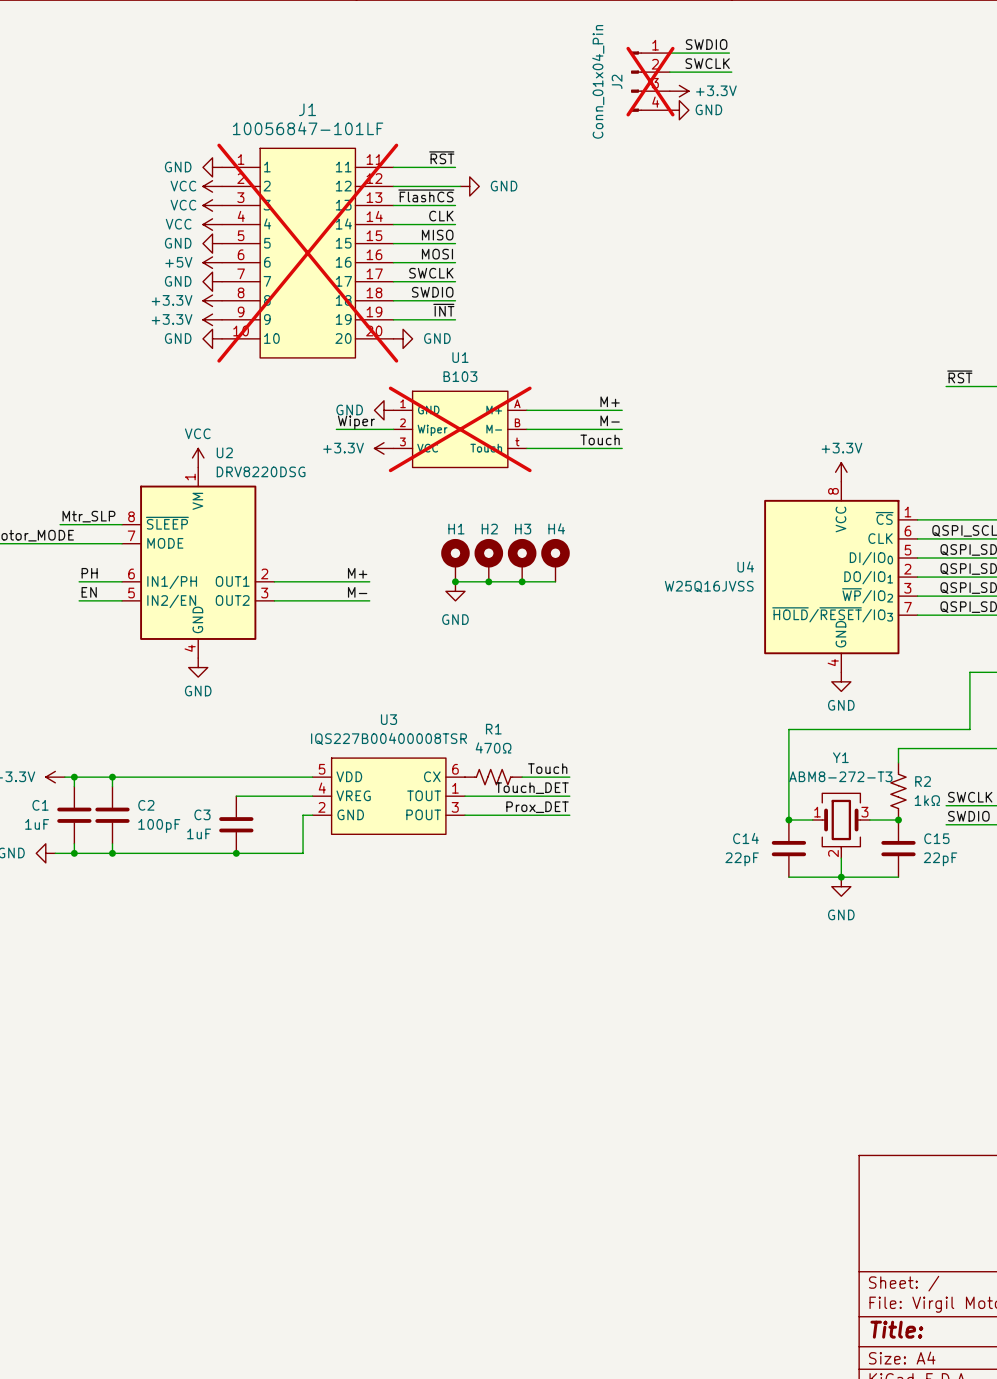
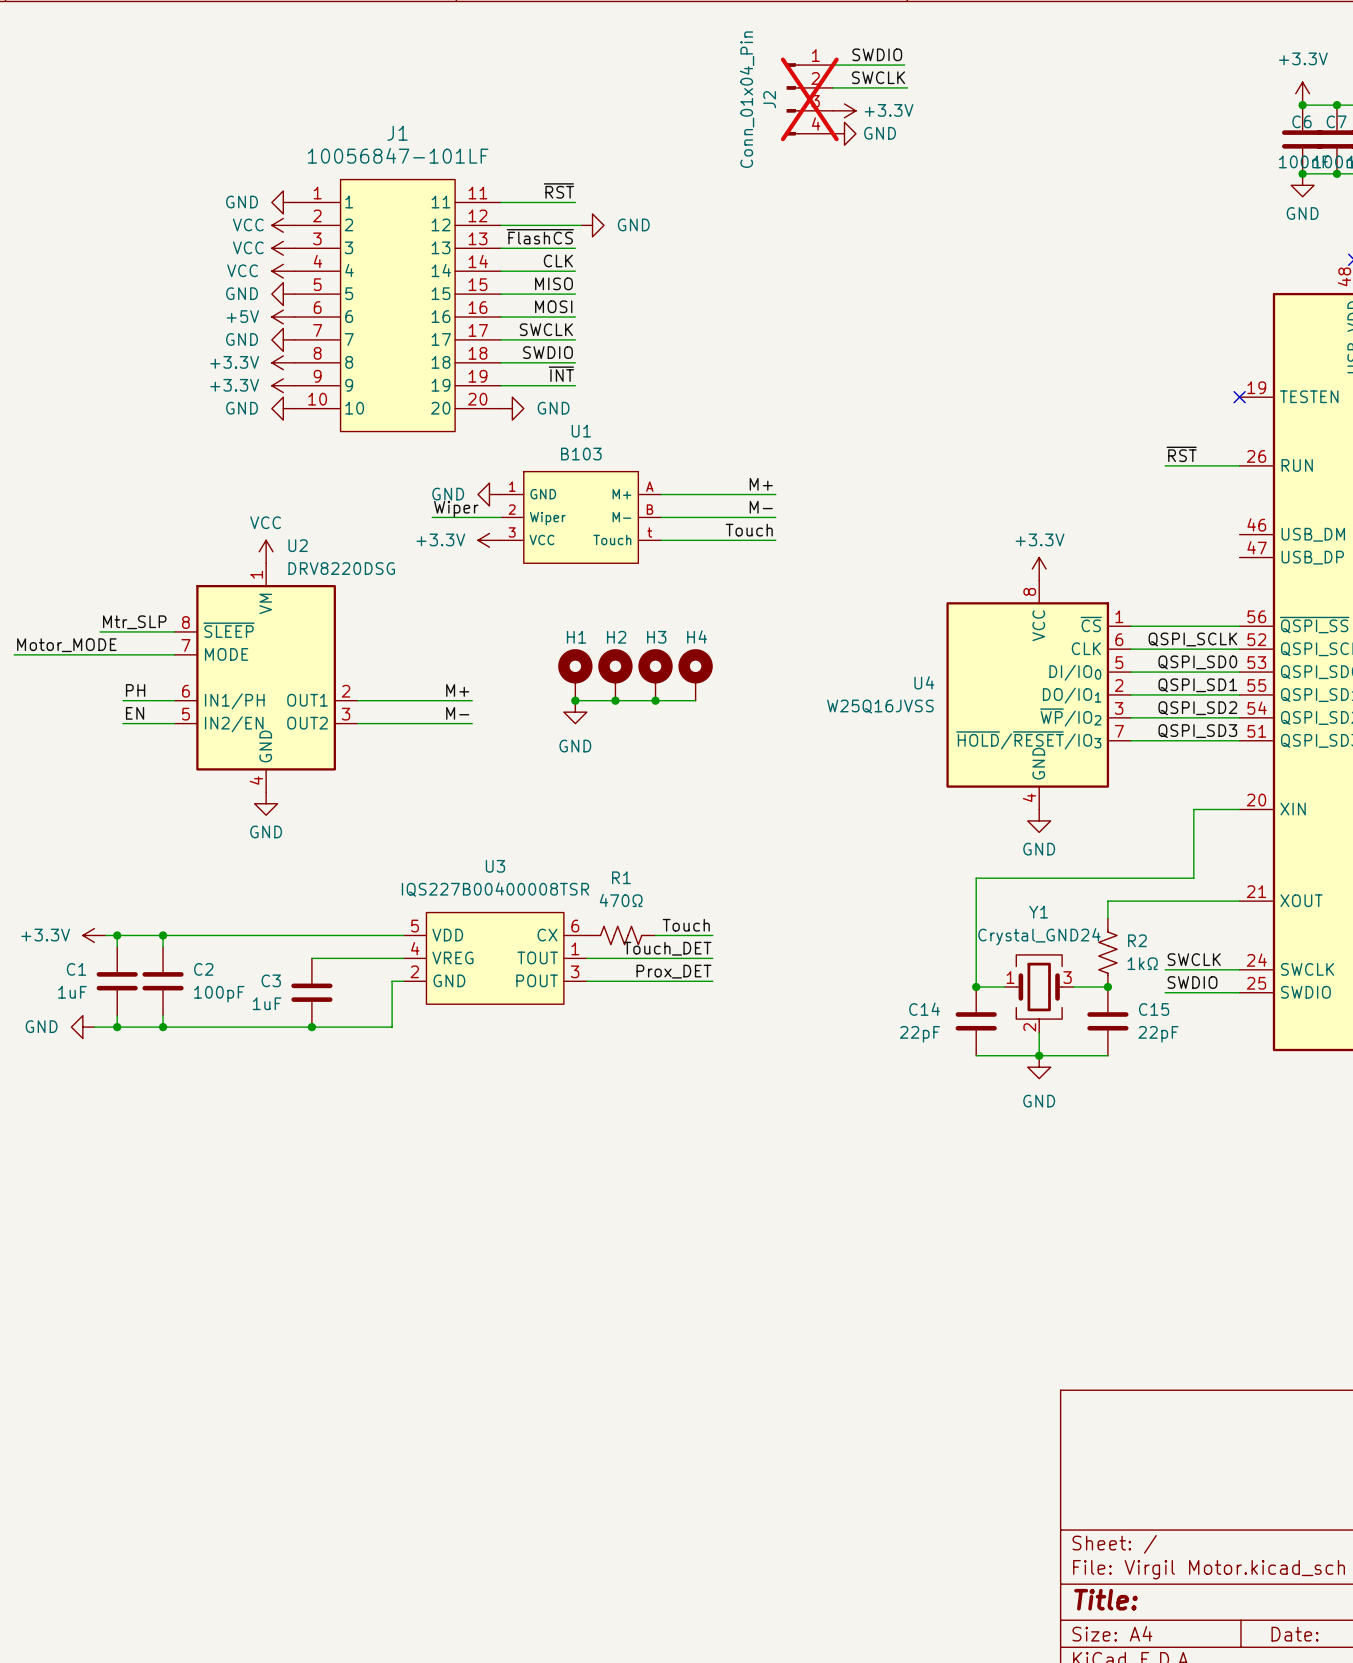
J1 do-not-place cross: (307, 253) -> none
U1 do-not-place cross: (460, 429) -> none
Y1 value: ABM8-272-T3 (840, 776) -> Crystal_GND24 (1039, 936)

